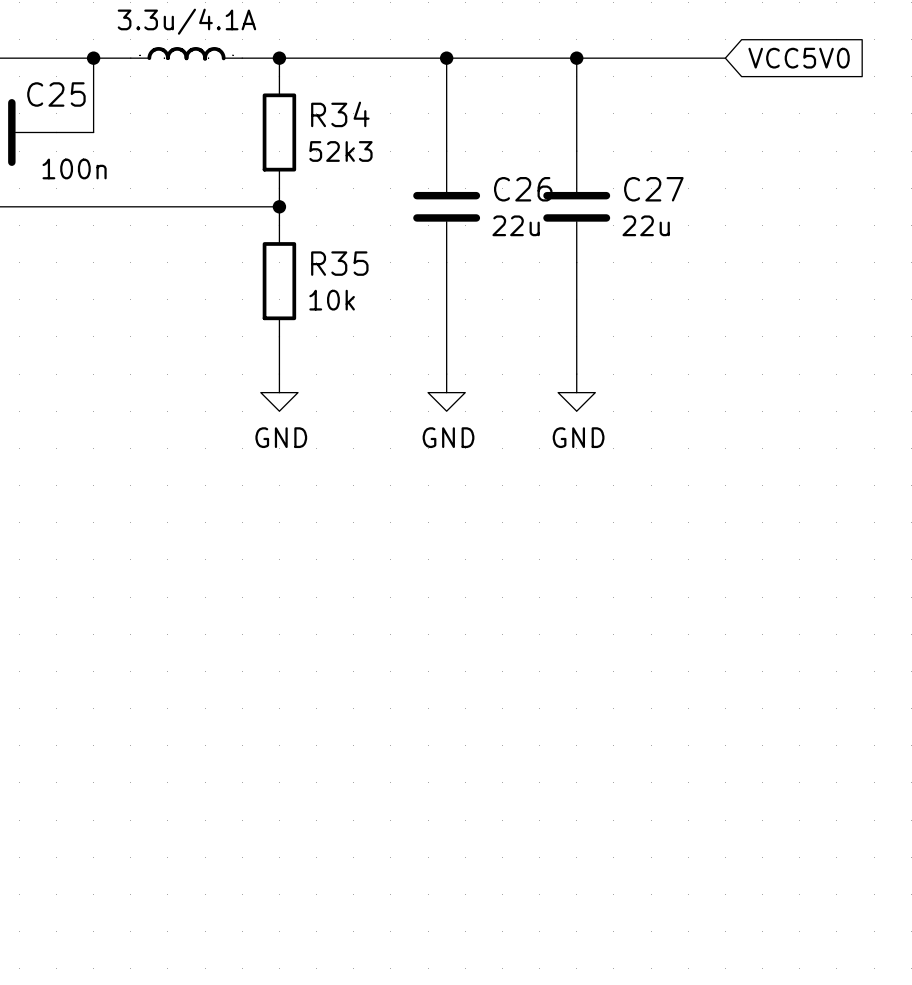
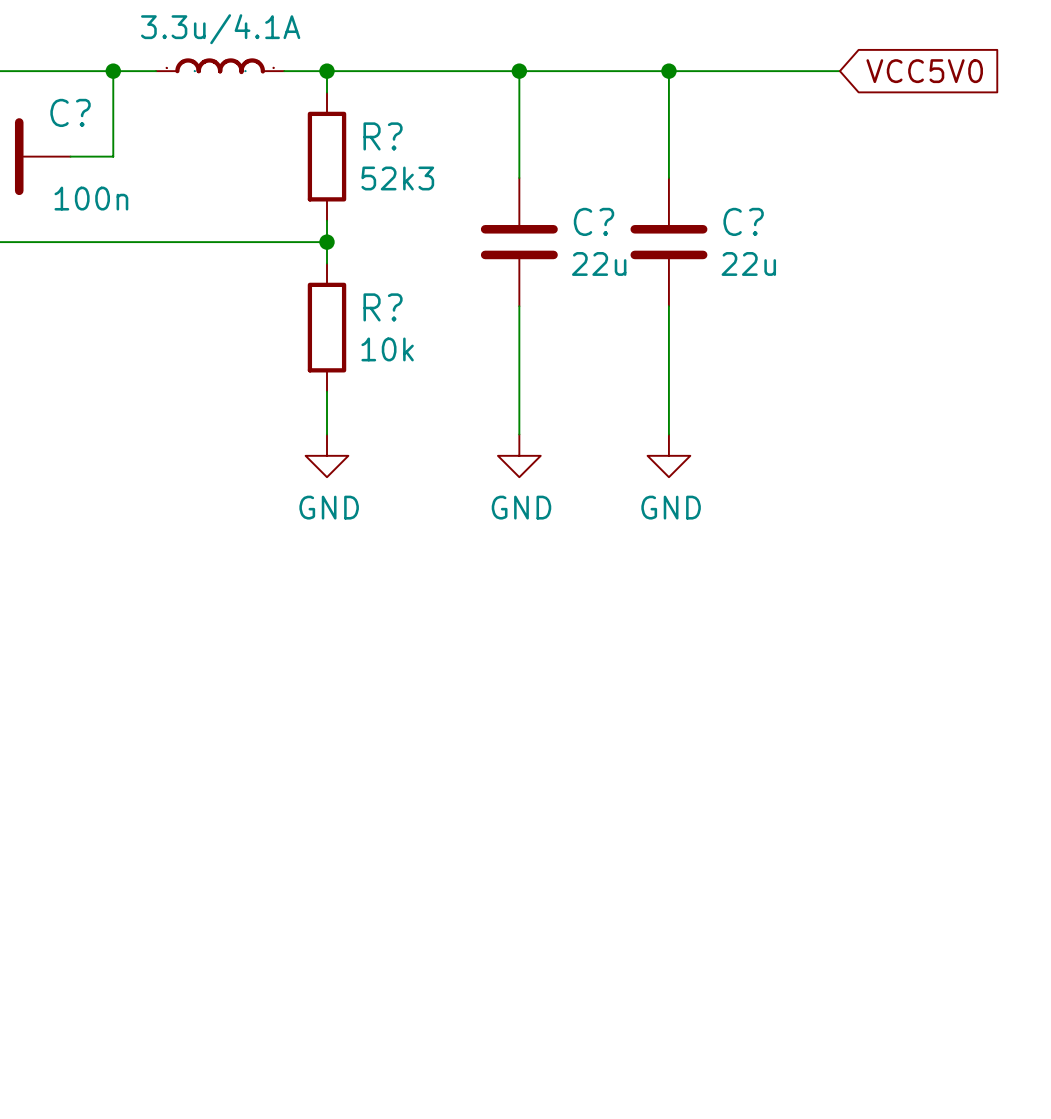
C25 name: C25 (56, 94) -> C? (70, 112)
R34 name: R34 (340, 114) -> R? (383, 136)
C26 name: C26 (523, 189) -> C? (594, 221)
C27 name: C27 (653, 189) -> C? (743, 221)
R35 name: R35 (339, 263) -> R? (383, 307)

